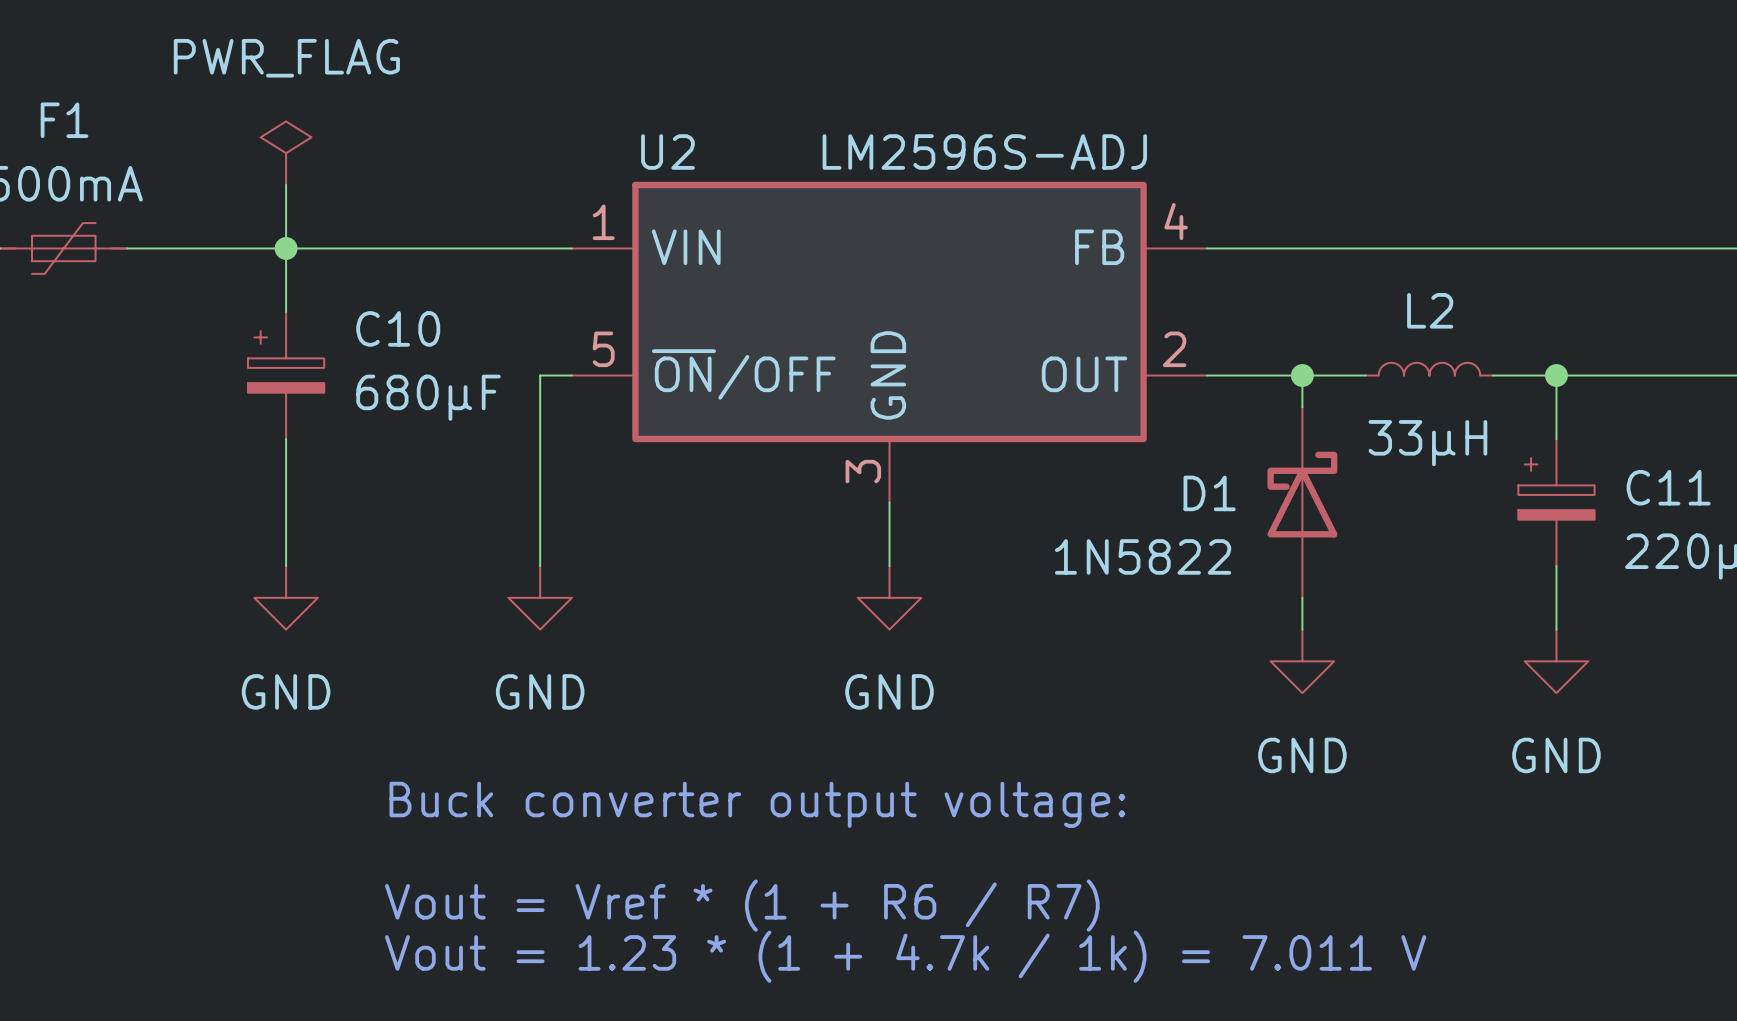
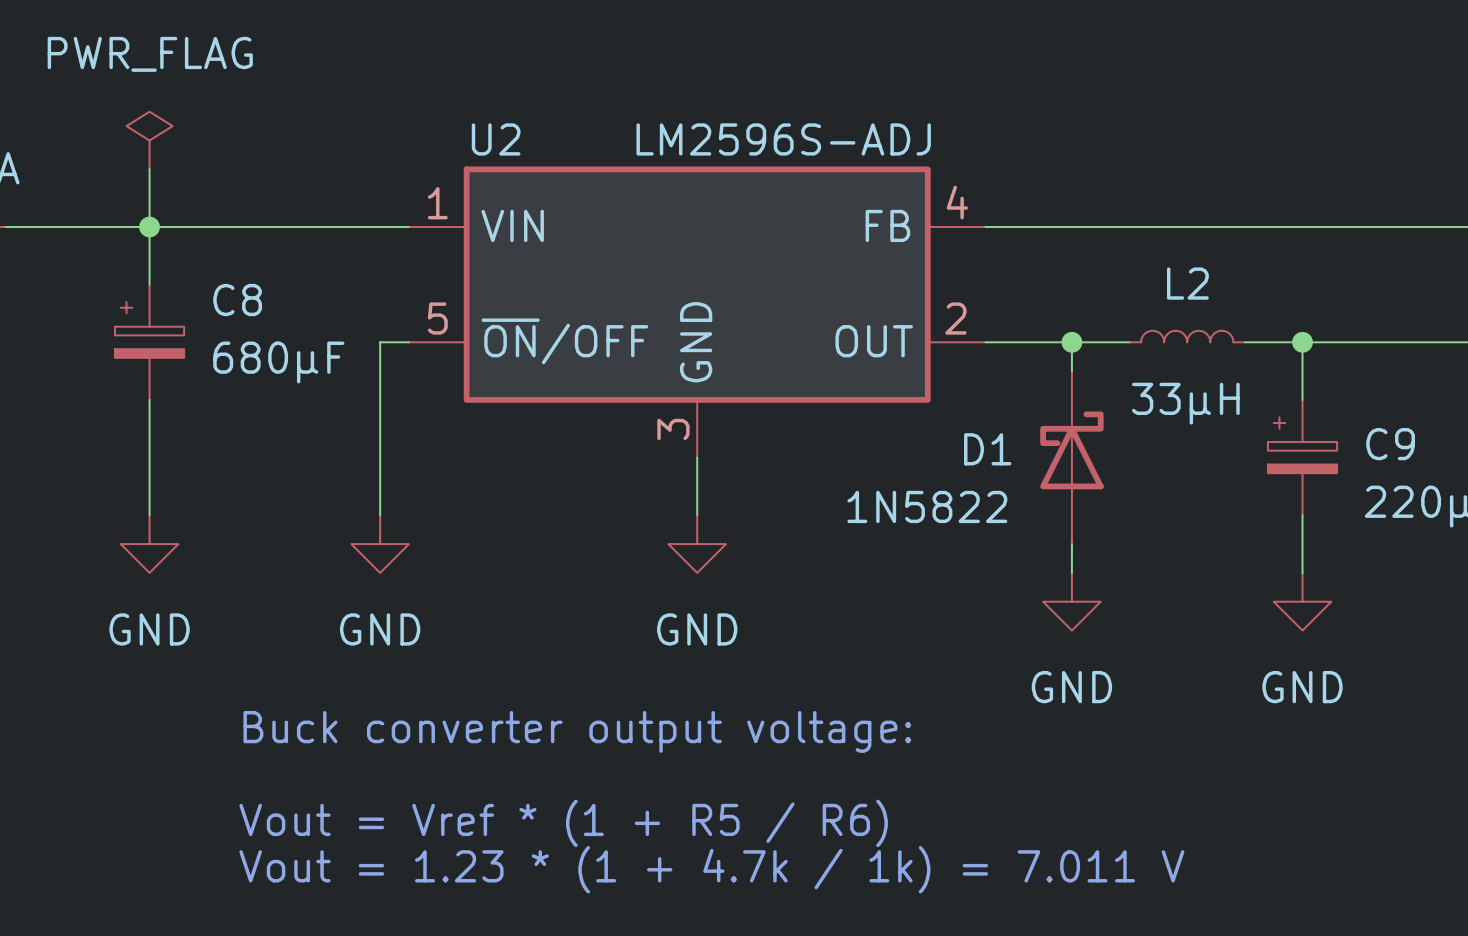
C10 name: C10 (398, 328) -> C8 (237, 300)
C11 name: C11 (1668, 487) -> C9 (1390, 444)
text: Vout = Vref * (1 + R6 / R7) (742, 905) -> Vout = Vref * (1 + R5 / R6) (563, 823)

